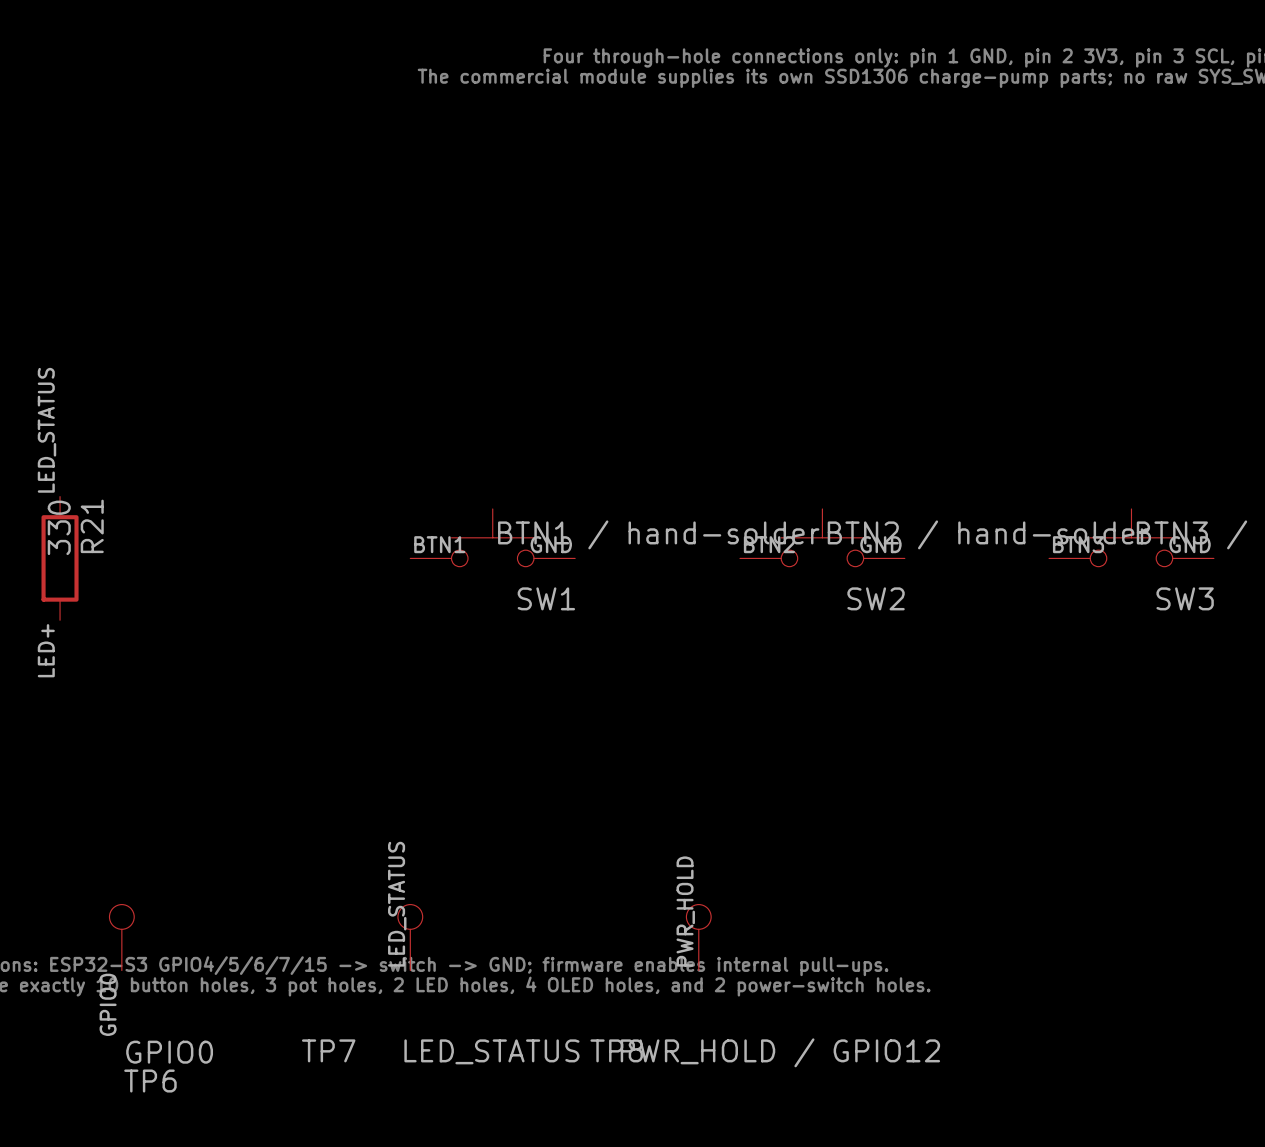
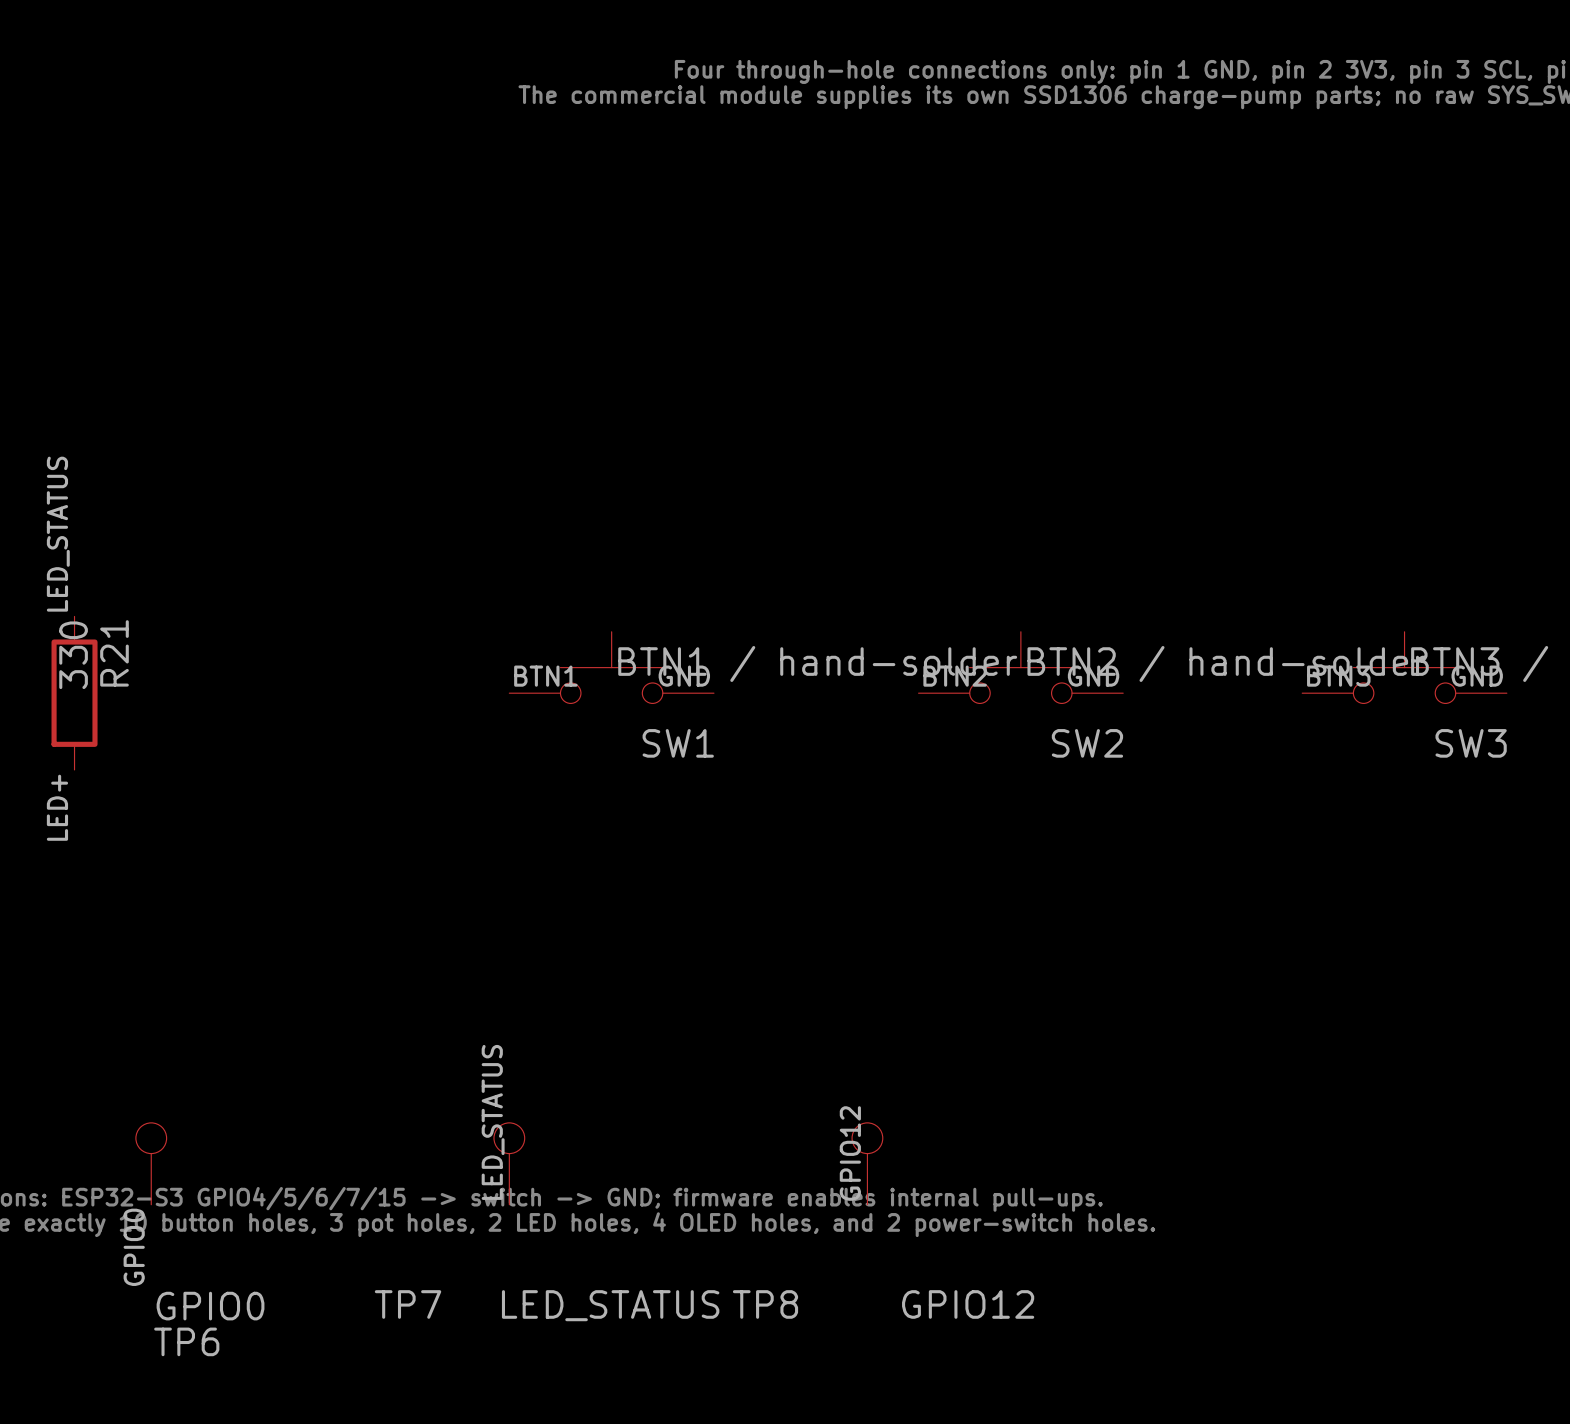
label: PWR_HOLD (685, 911) -> GPIO12 (850, 1153)
TP8 value: PWR_HOLD / GPIO12 (780, 1052) -> GPIO12 (968, 1304)

